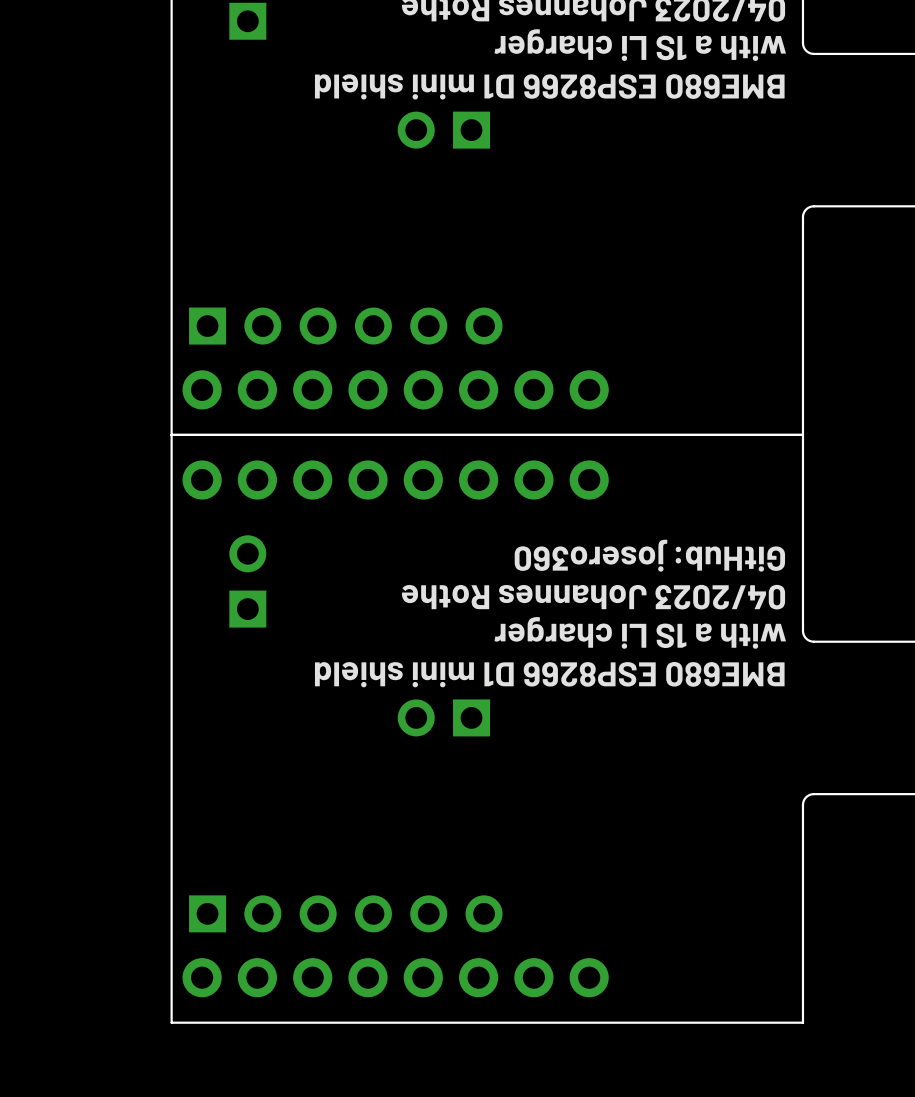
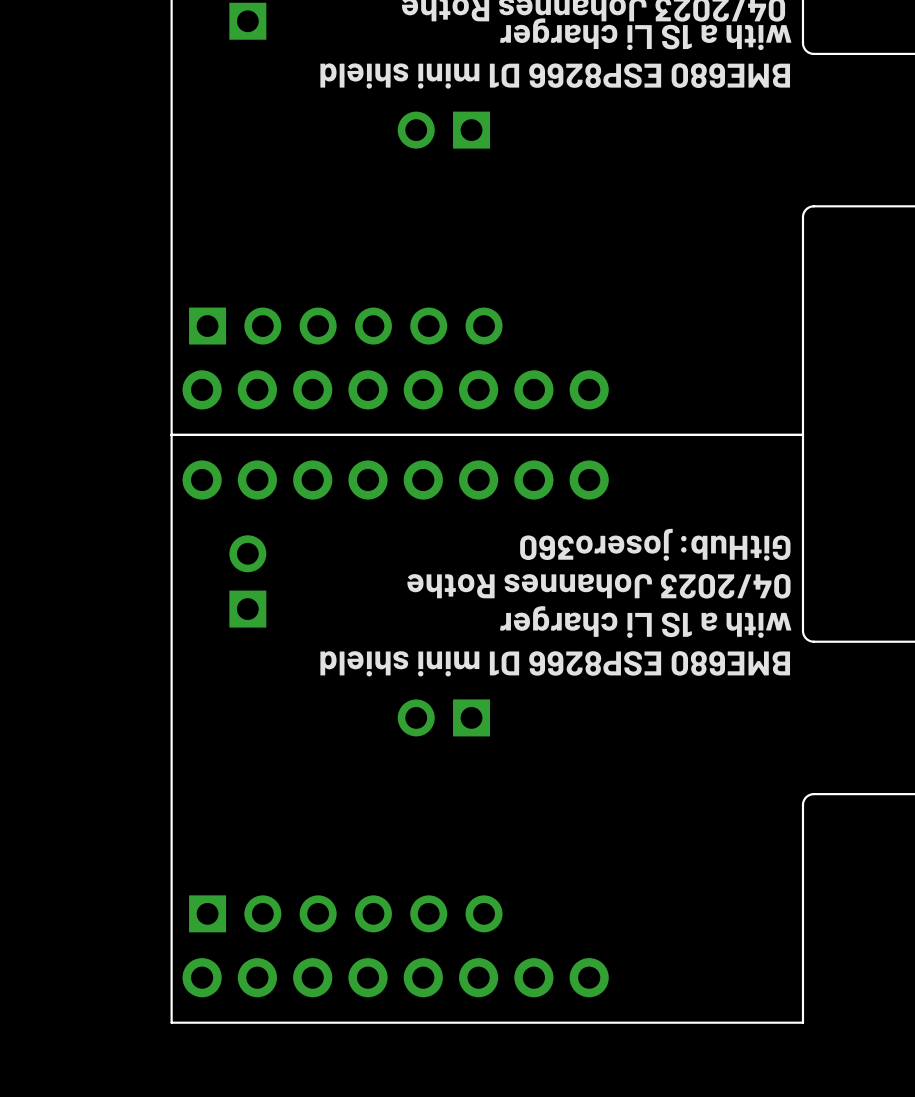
text position: with a 1S Li charger (640, 45) -> with a 1S Li charger (645, 34)
text position: BME680 ESP8266 D1 mini shield (549, 86) -> BME680 ESP8266 D1 mini shield (555, 75)
text position: GitHub: josero360 (649, 555) -> GitHub: josero360 (655, 544)
text position: 04/2023 Johannes Rothe (593, 597) -> 04/2023 Johannes Rothe (598, 586)
text position: with a 1S Li charger (640, 632) -> with a 1S Li charger (645, 622)
text position: BME680 ESP8266 D1 mini shield (549, 674) -> BME680 ESP8266 D1 mini shield (555, 663)

